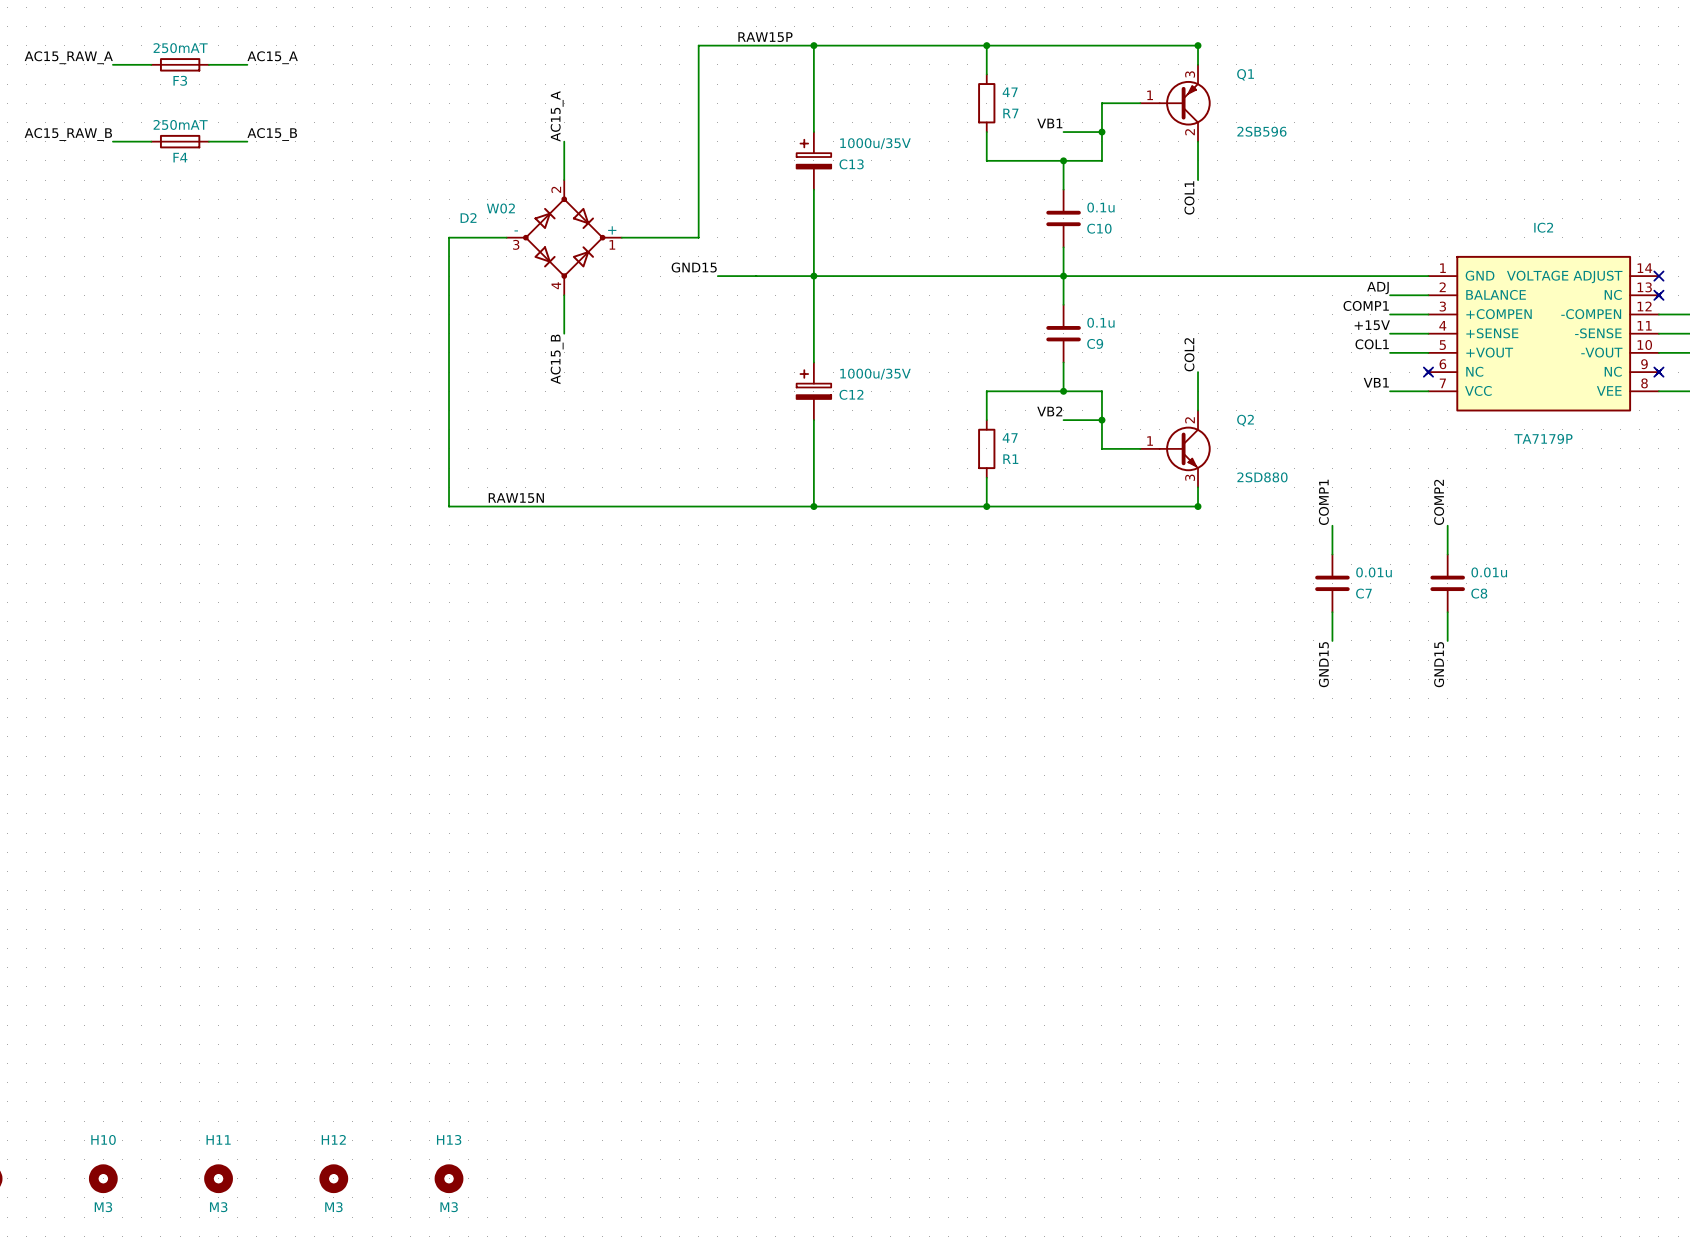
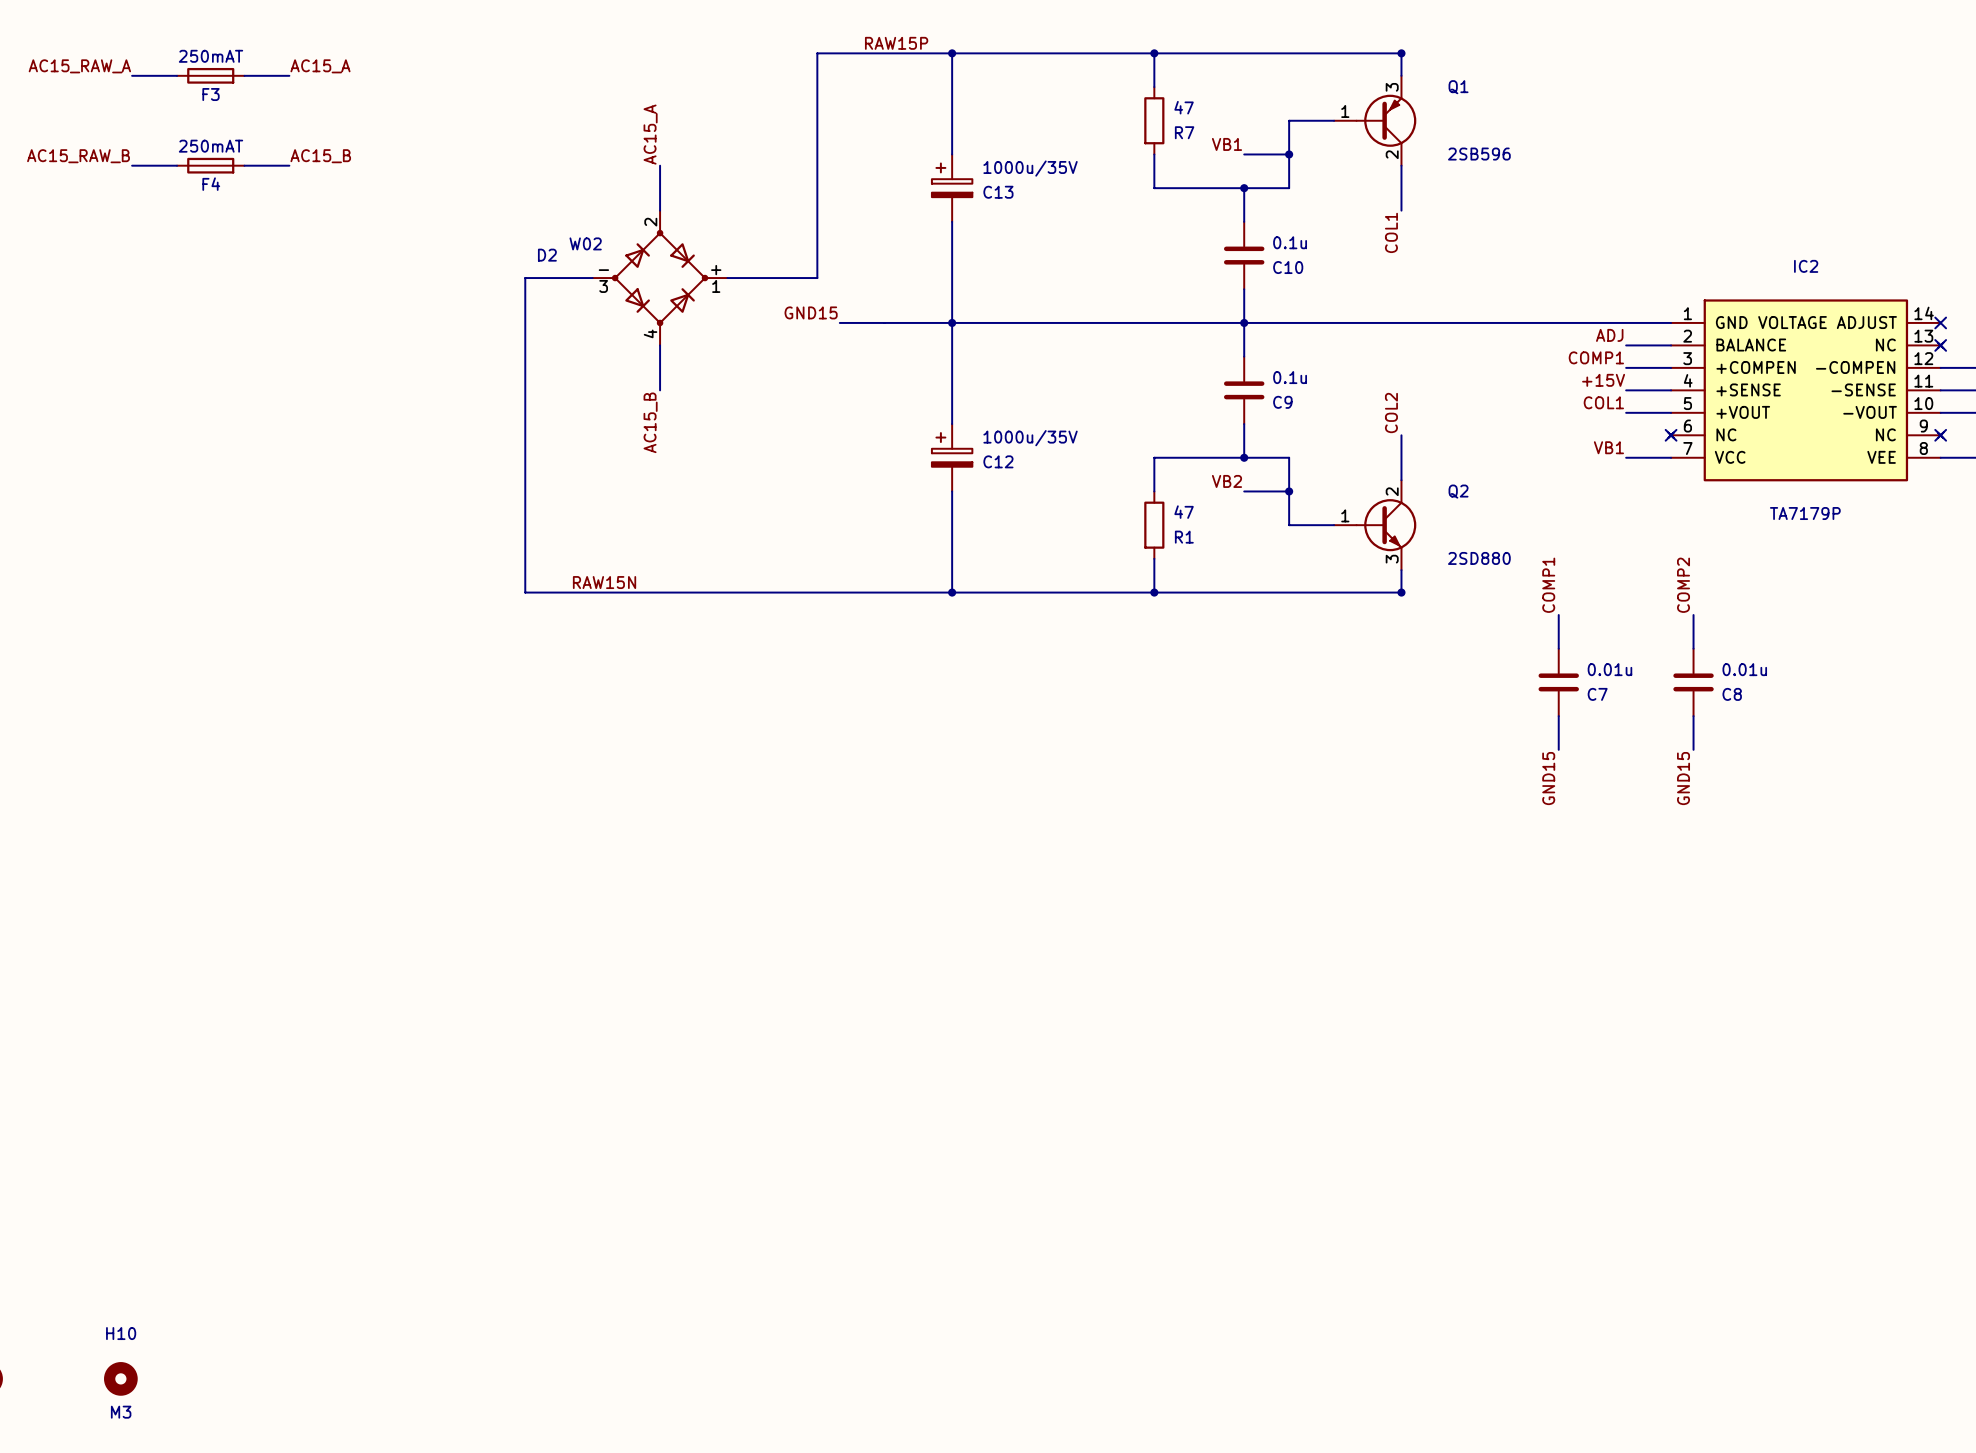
H11: M3 (218, 1178) -> none
H12: M3 (333, 1178) -> none
H13: M3 (449, 1178) -> none

